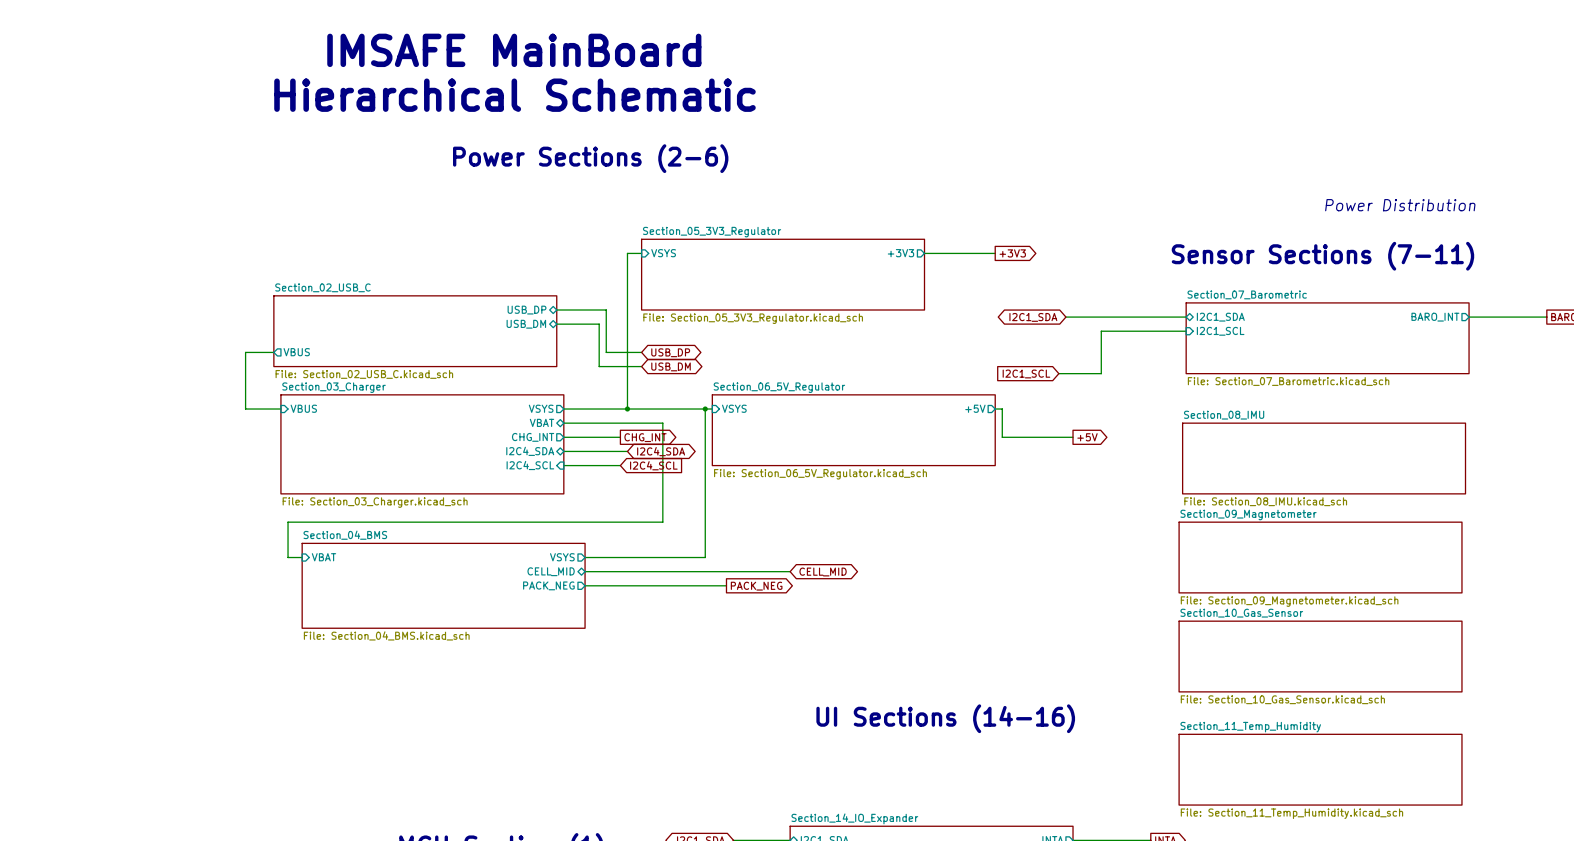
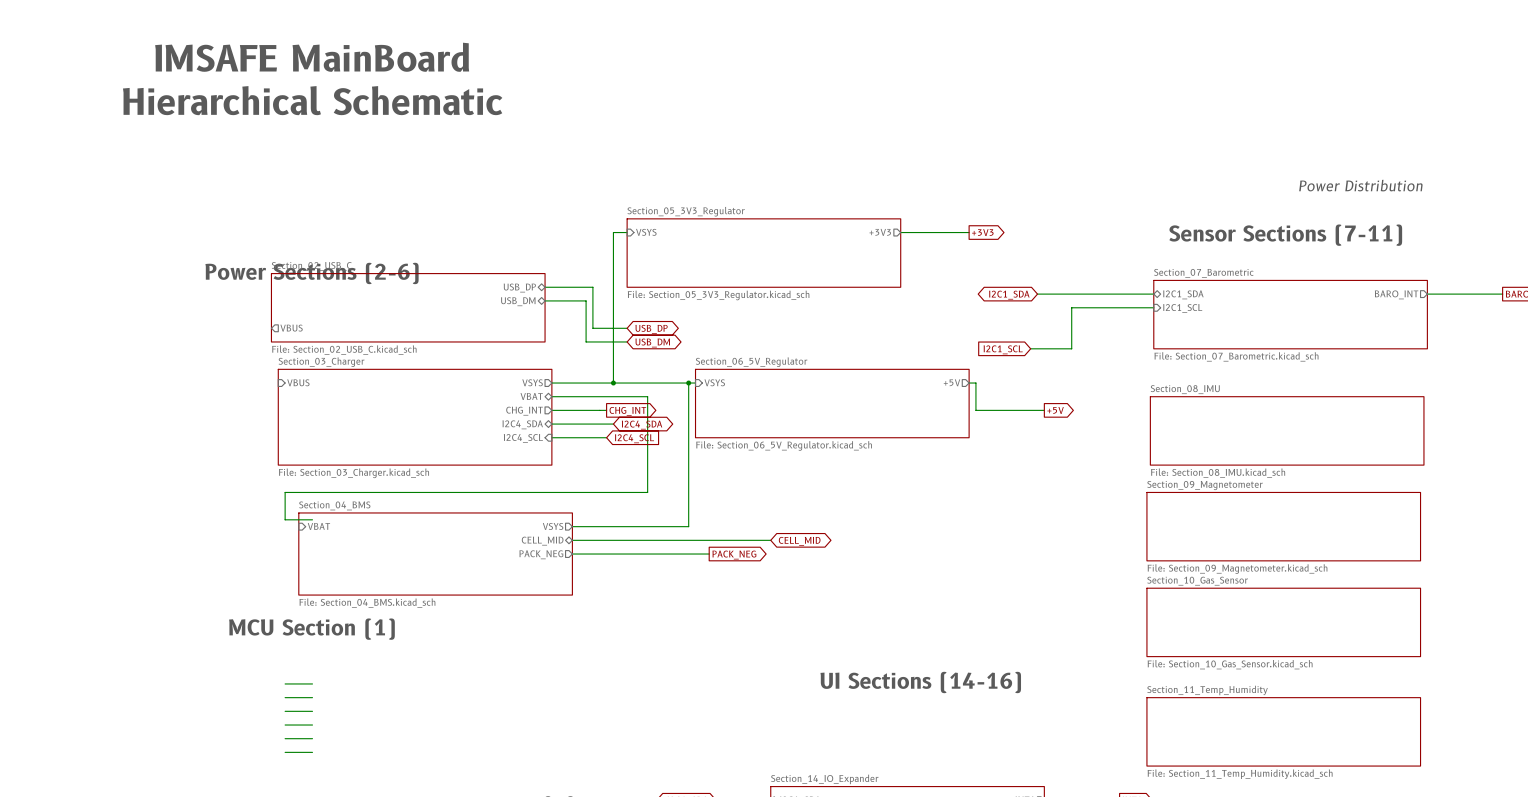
text: IMSAFE MainBoard (514, 50) -> none
text: none -> IMSAFE MainBoard (312, 57)
text: Hierarchical Schematic (514, 95) -> none
text: none -> Hierarchical Schematic (312, 100)
text: Power Sections (2-6) (590, 158) -> none
text: none -> Power Sections (2-6) (312, 273)
wire: (273, 352) (245, 352) (245, 409) (280, 409) -> none
wire: (288, 550) (288, 557) (302, 557) -> (285, 519) (312, 519)
text: none -> MCU Section (1) (311, 629)
wire: none -> (285, 683) (312, 683)
wire: none -> (285, 697) (312, 697)
wire: none -> (285, 711) (312, 711)
wire: none -> (285, 725) (312, 725)
wire: none -> (285, 738) (312, 738)
wire: none -> (285, 752) (312, 752)

